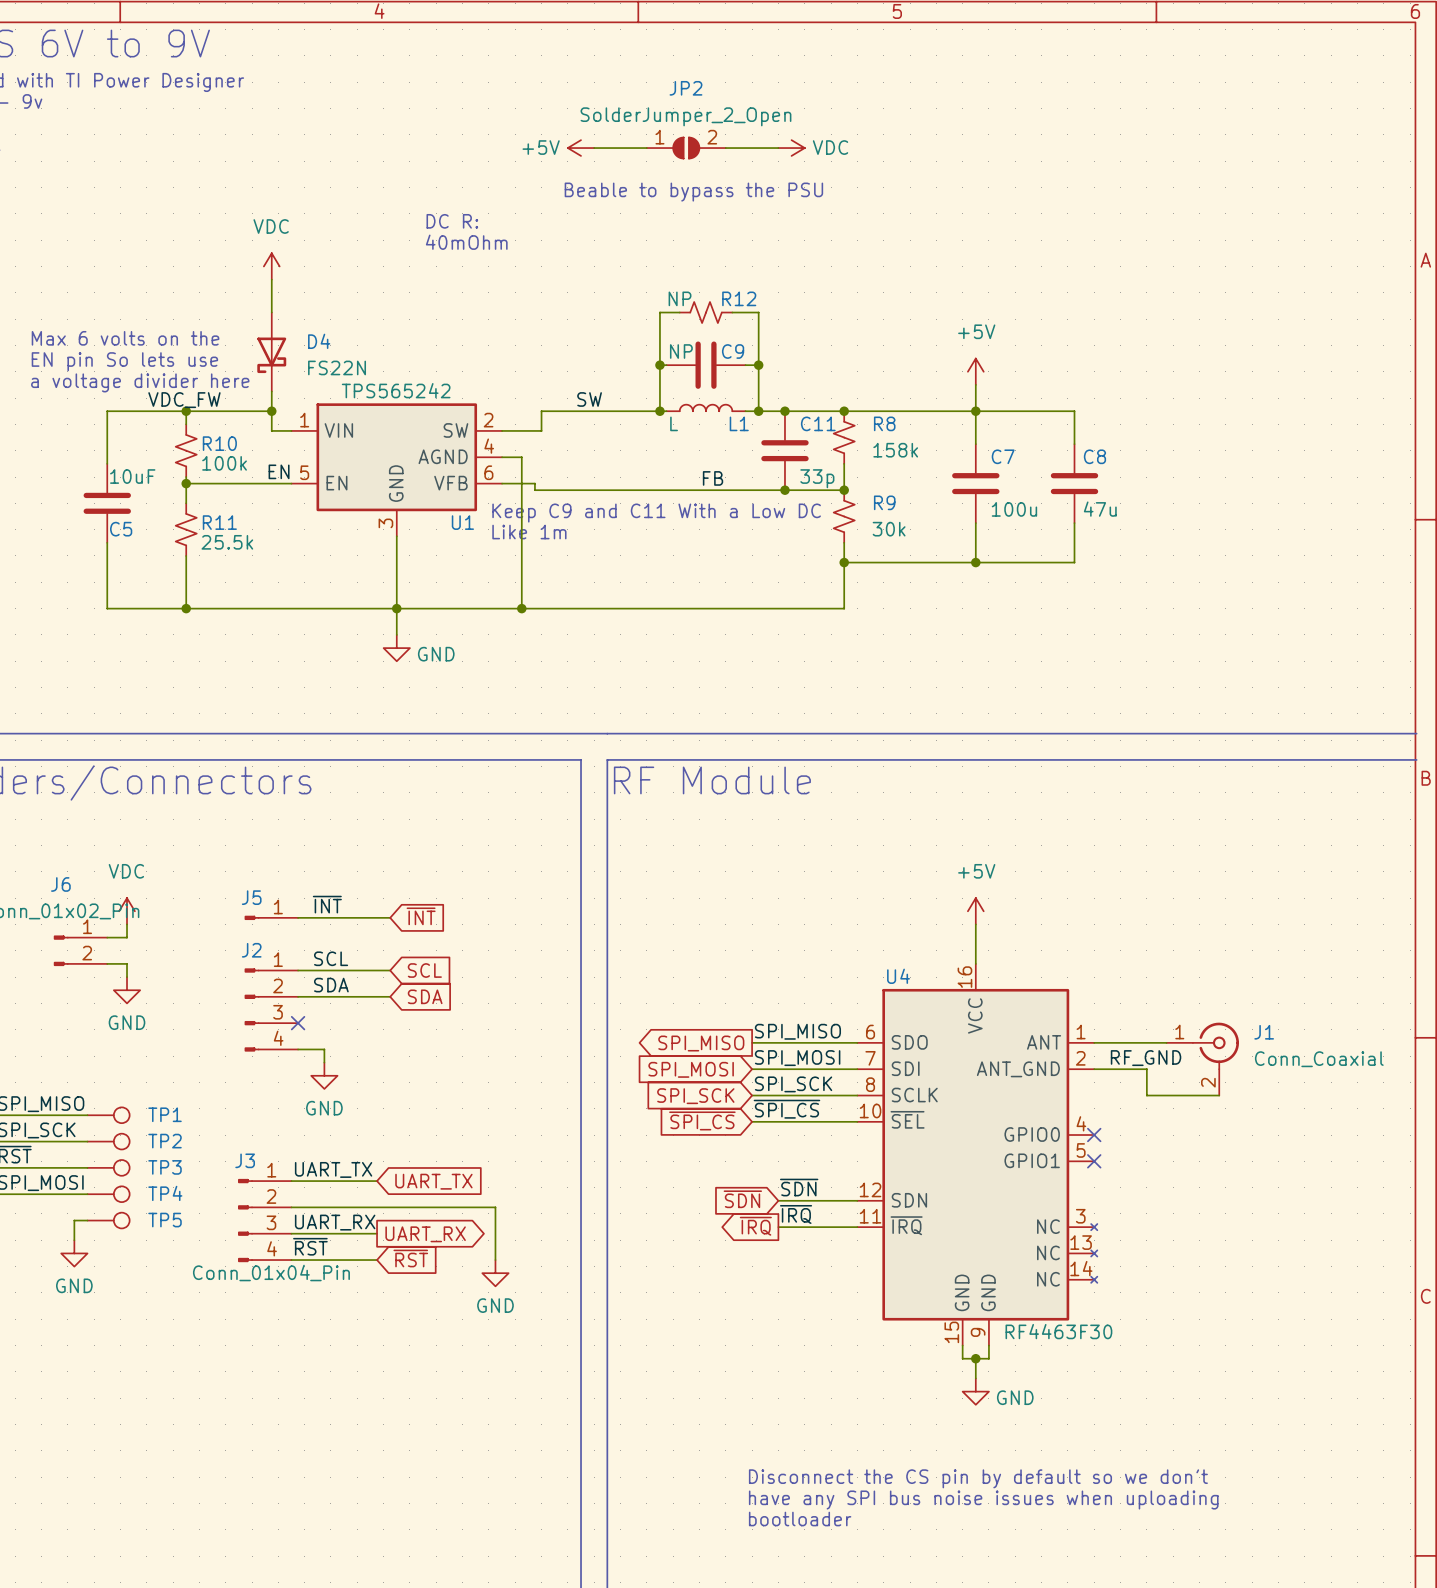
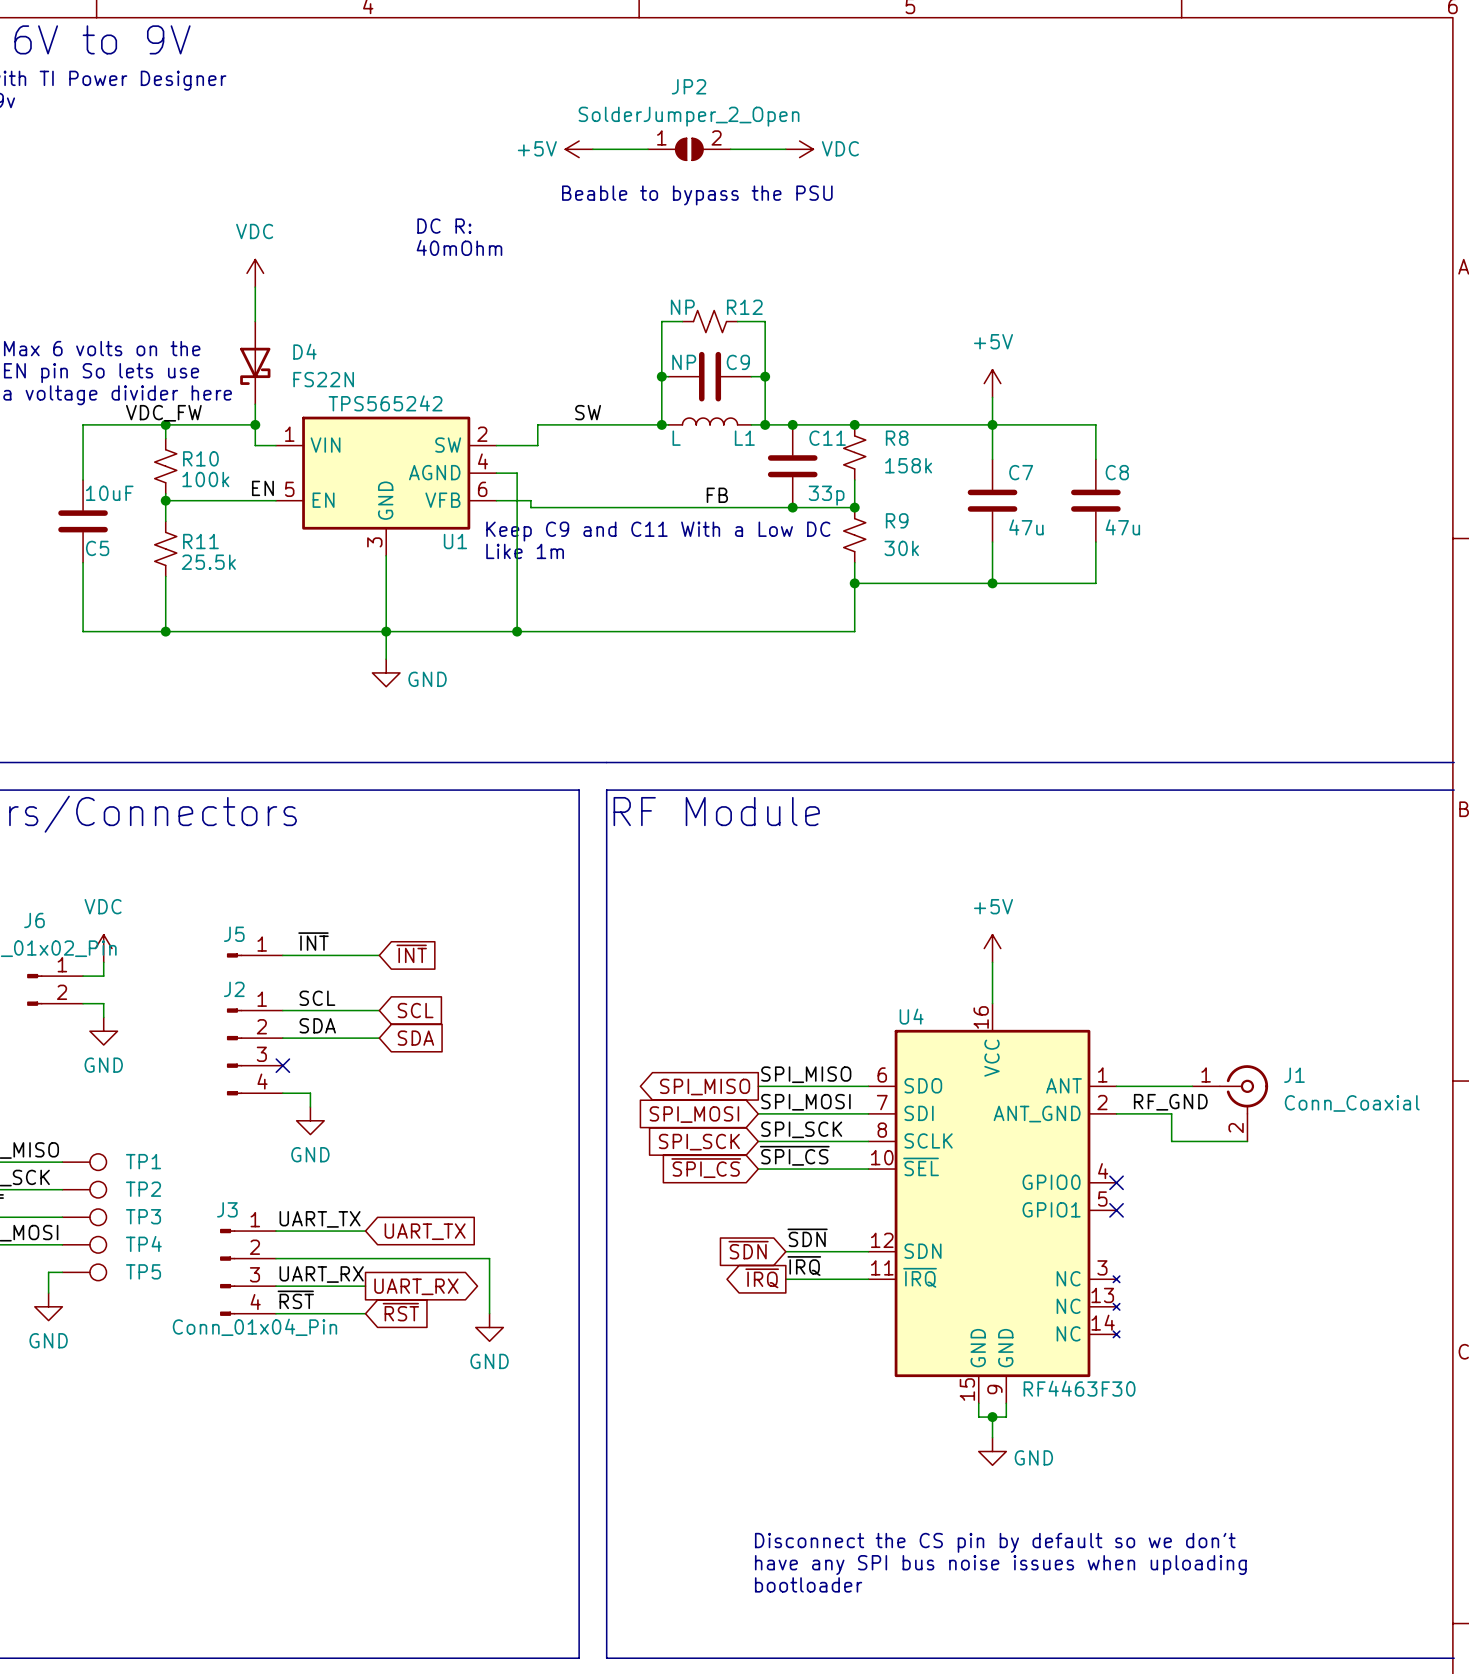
C7 value: 100u (1014, 509) -> 47u (1026, 527)

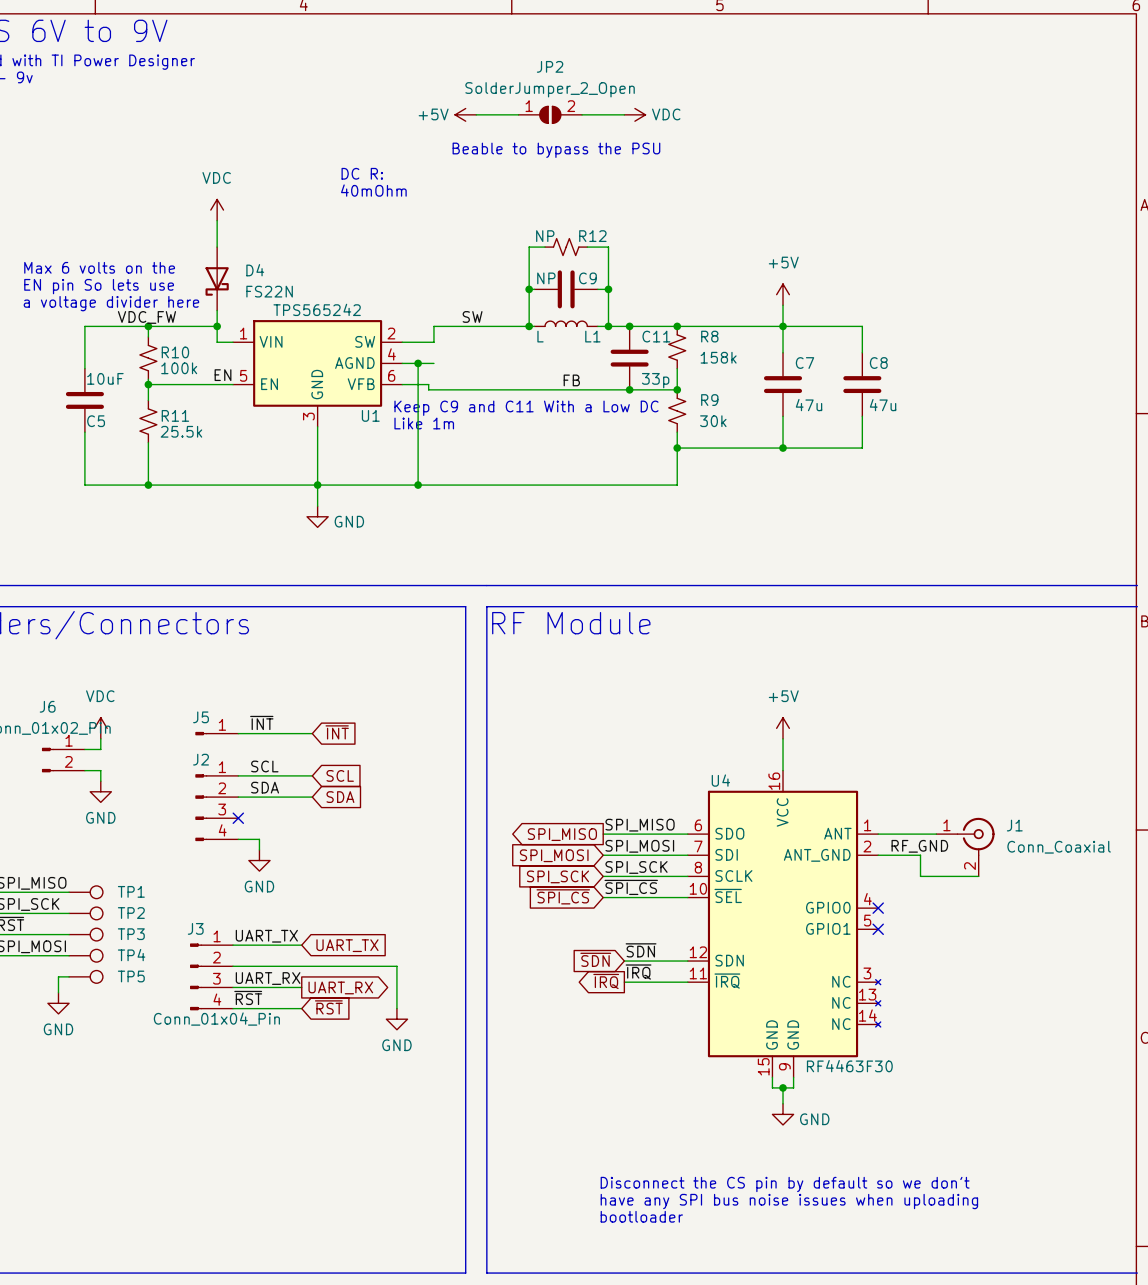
wire: none -> (418, 363) (433, 363)
junction: none -> (418, 363)

